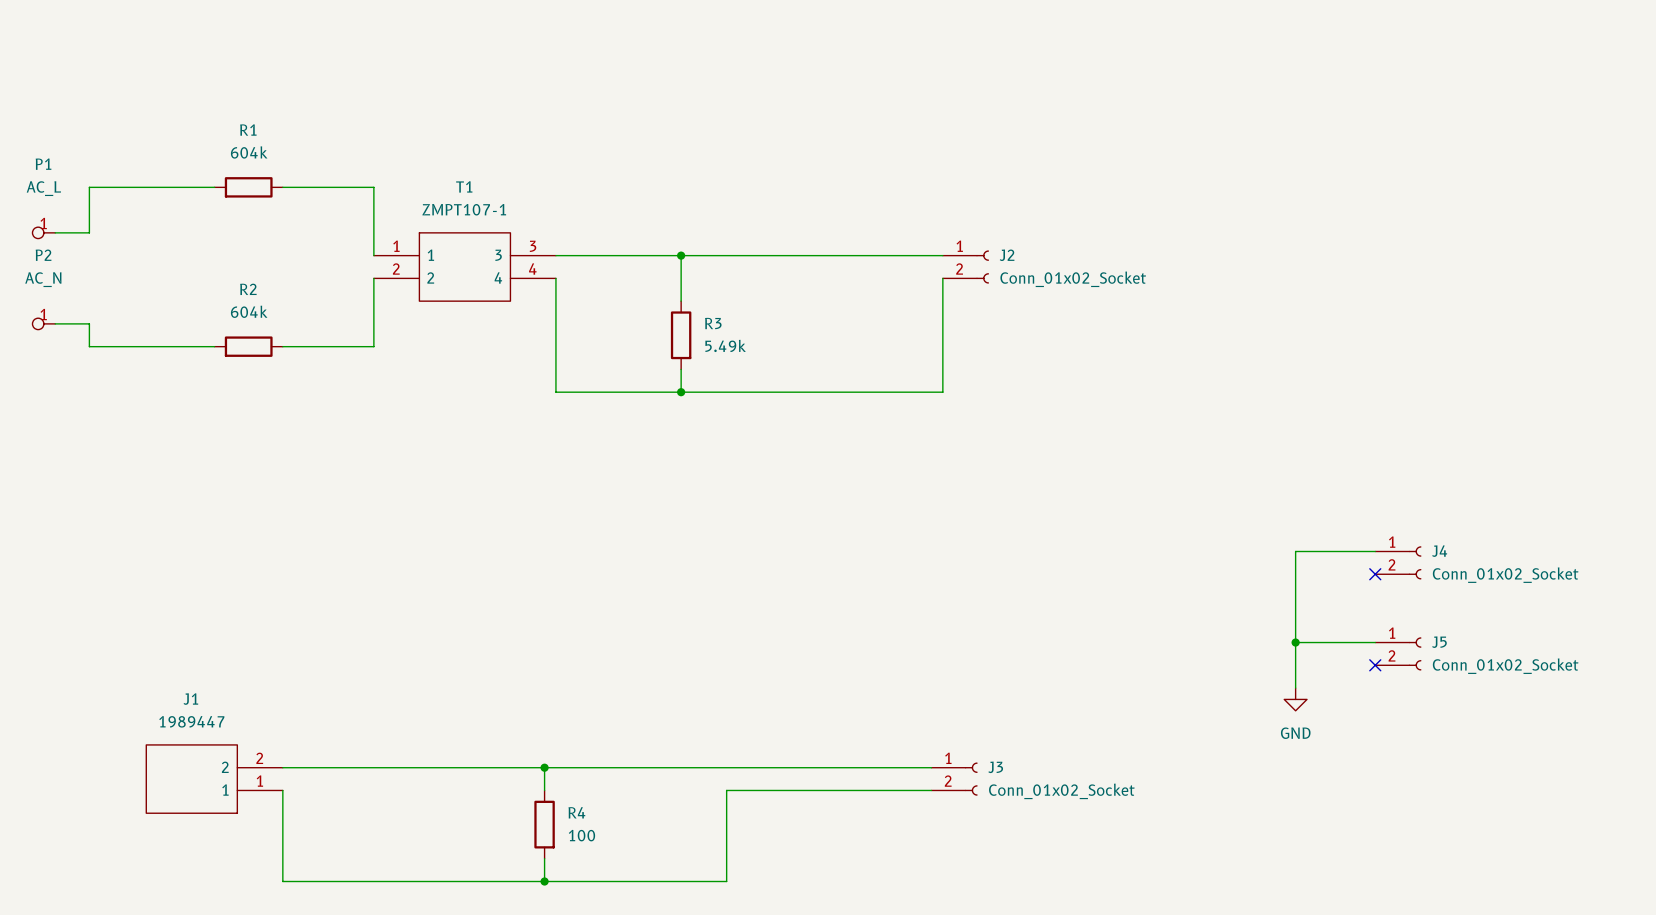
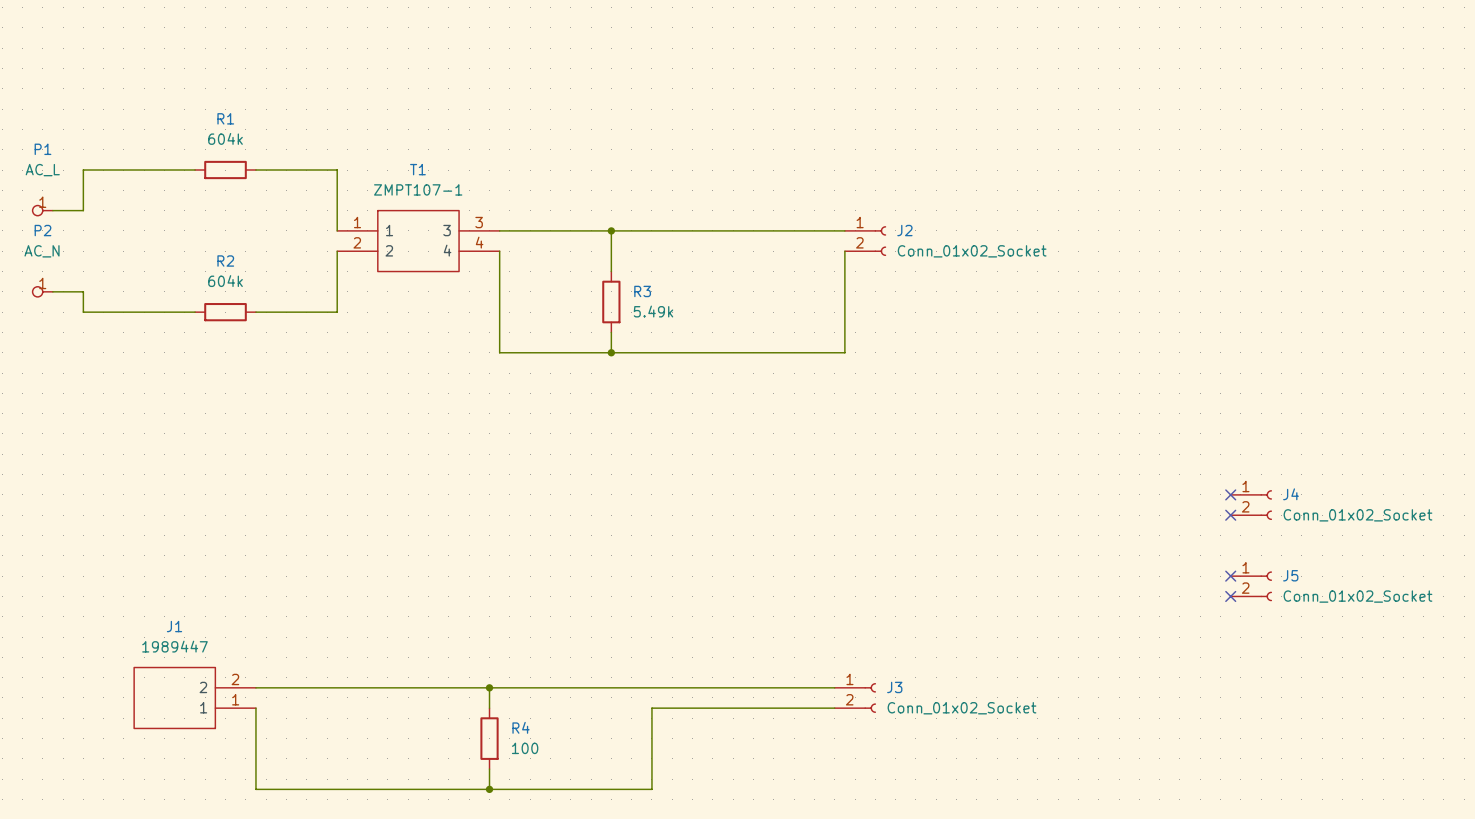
wire: (1375, 551) (1295, 551) (1295, 688) -> none
no-connect mark: none -> (1230, 494)
wire: (1295, 642) (1375, 642) -> none
junction: (1295, 642) -> none
no-connect mark: none -> (1230, 576)
power symbol: GND (1295, 699) -> none

